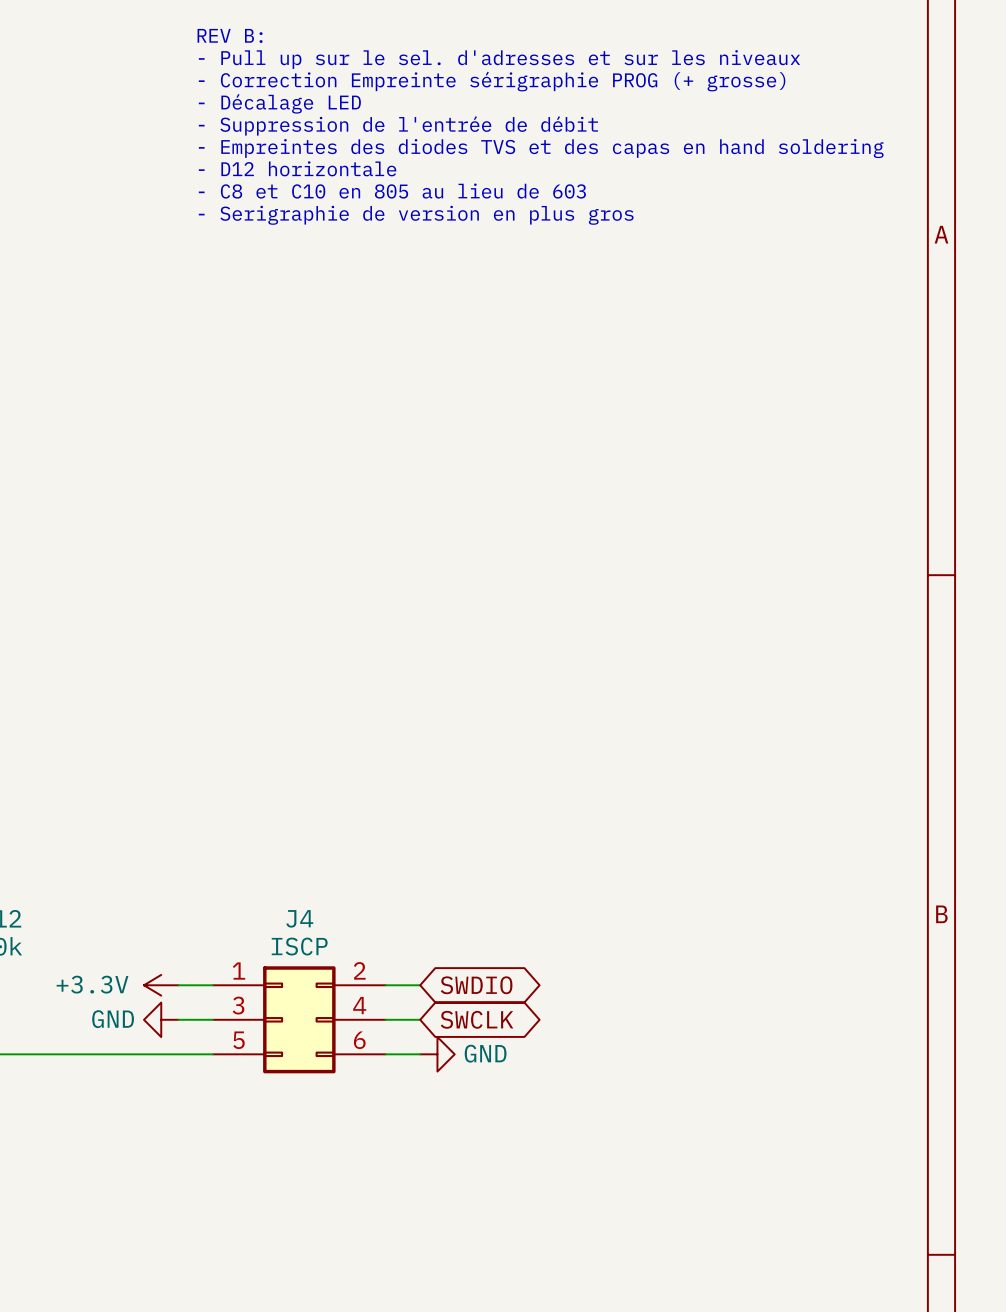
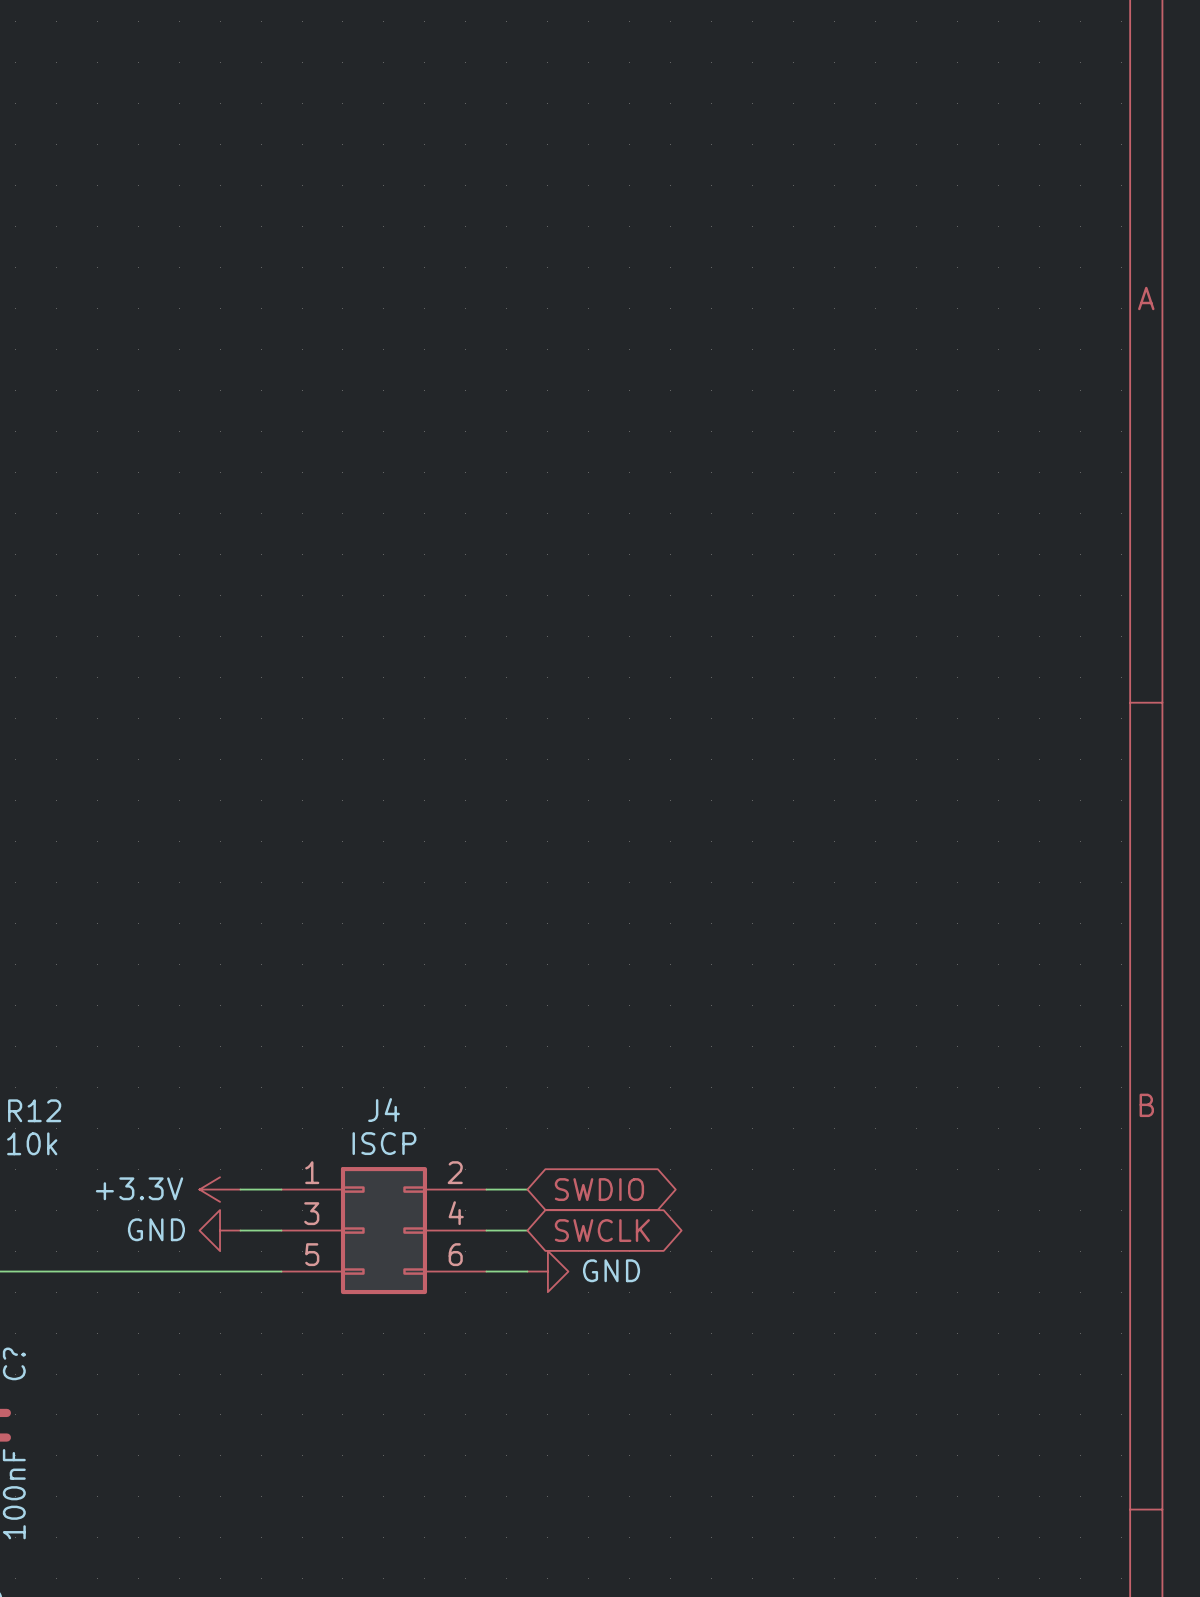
text: REV B: (230, 35) -> none
text: - Pull up sur le sel. d'adresses et sur les niveaux (499, 59) -> none
text: - Correction Empreinte sérigraphie PROG (+ grosse) (492, 81) -> none
text: - Décalage LED (279, 103) -> none
text: - Suppression de l'entrée de débit (398, 125) -> none
text: - Empreintes des diodes TVS et des capas en hand soldering (541, 148) -> none
text: - D12 horizontale (297, 168) -> none
text: - C8 et C10 en 805 au lieu de 603 (392, 191) -> none
text: - Serigraphie de version en plus gros (416, 215) -> none

